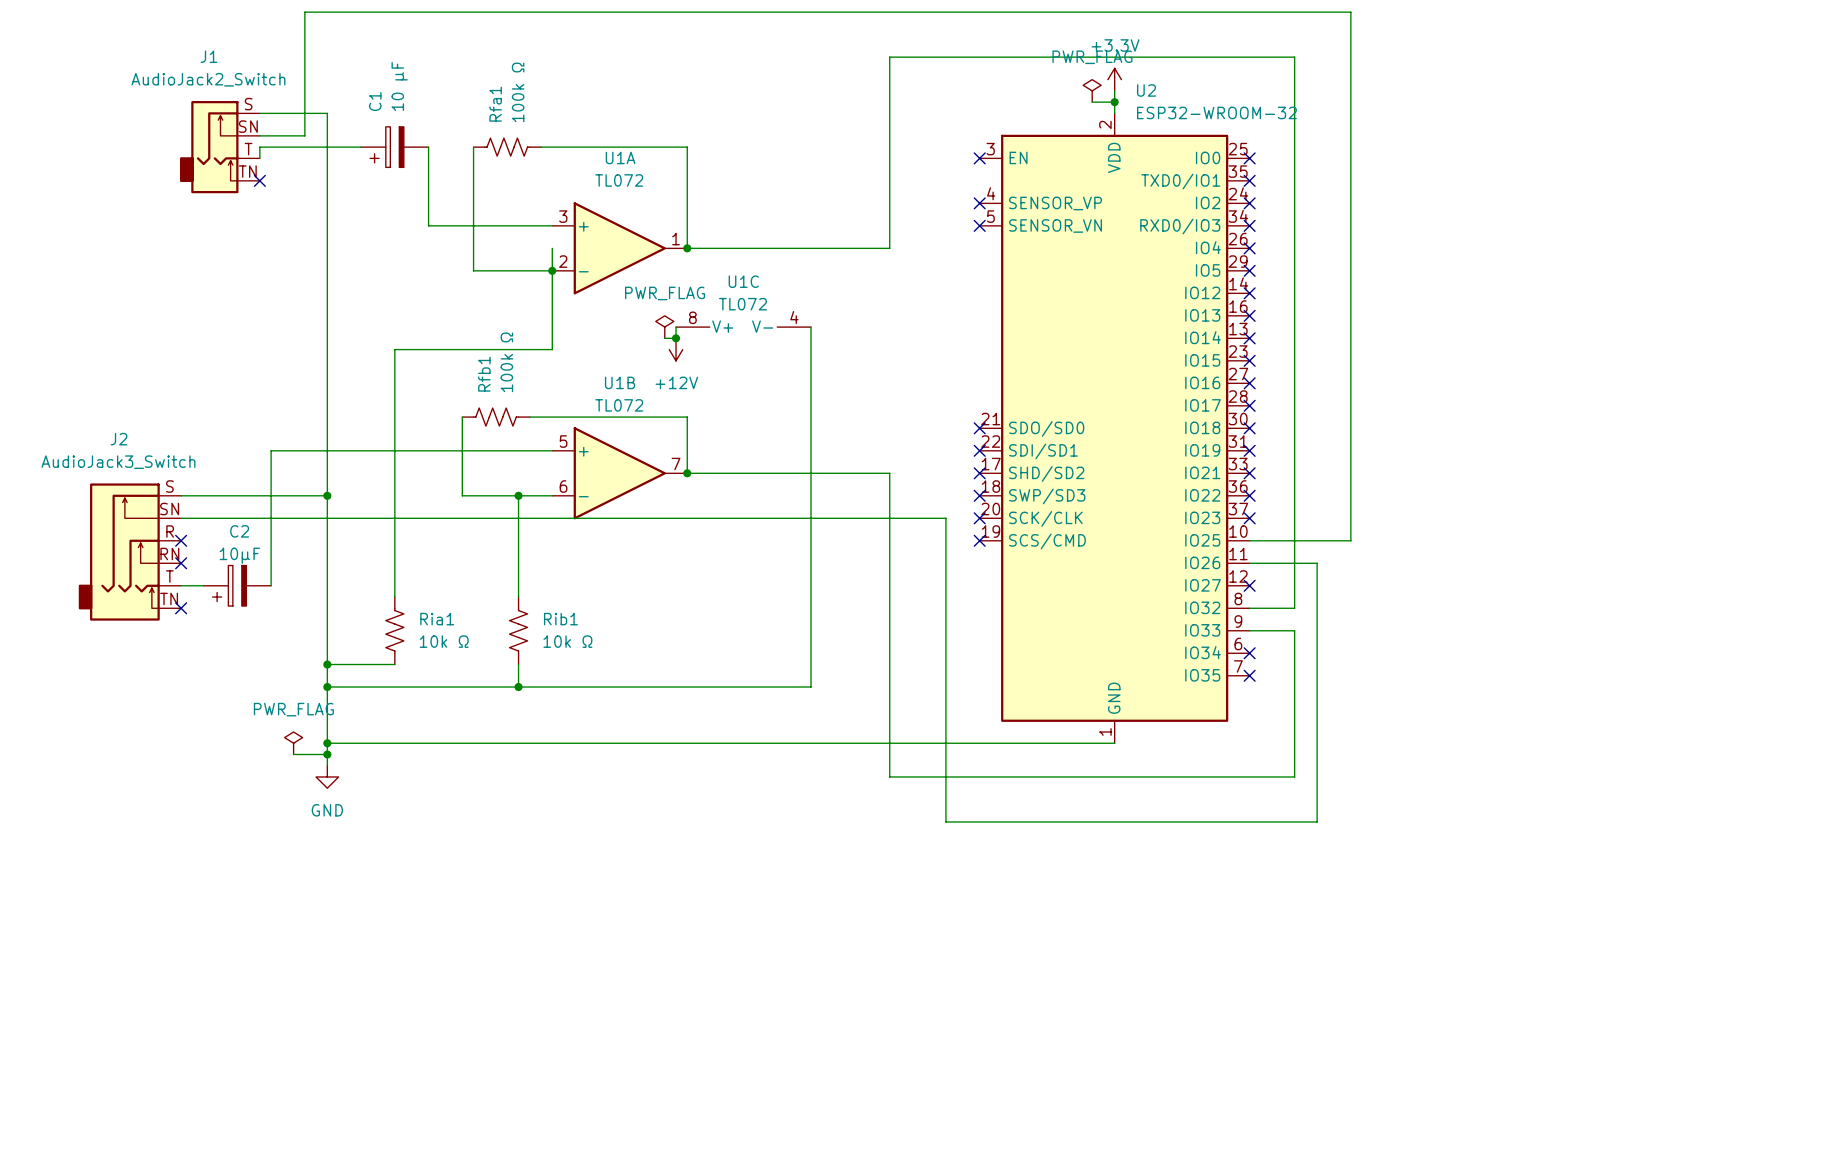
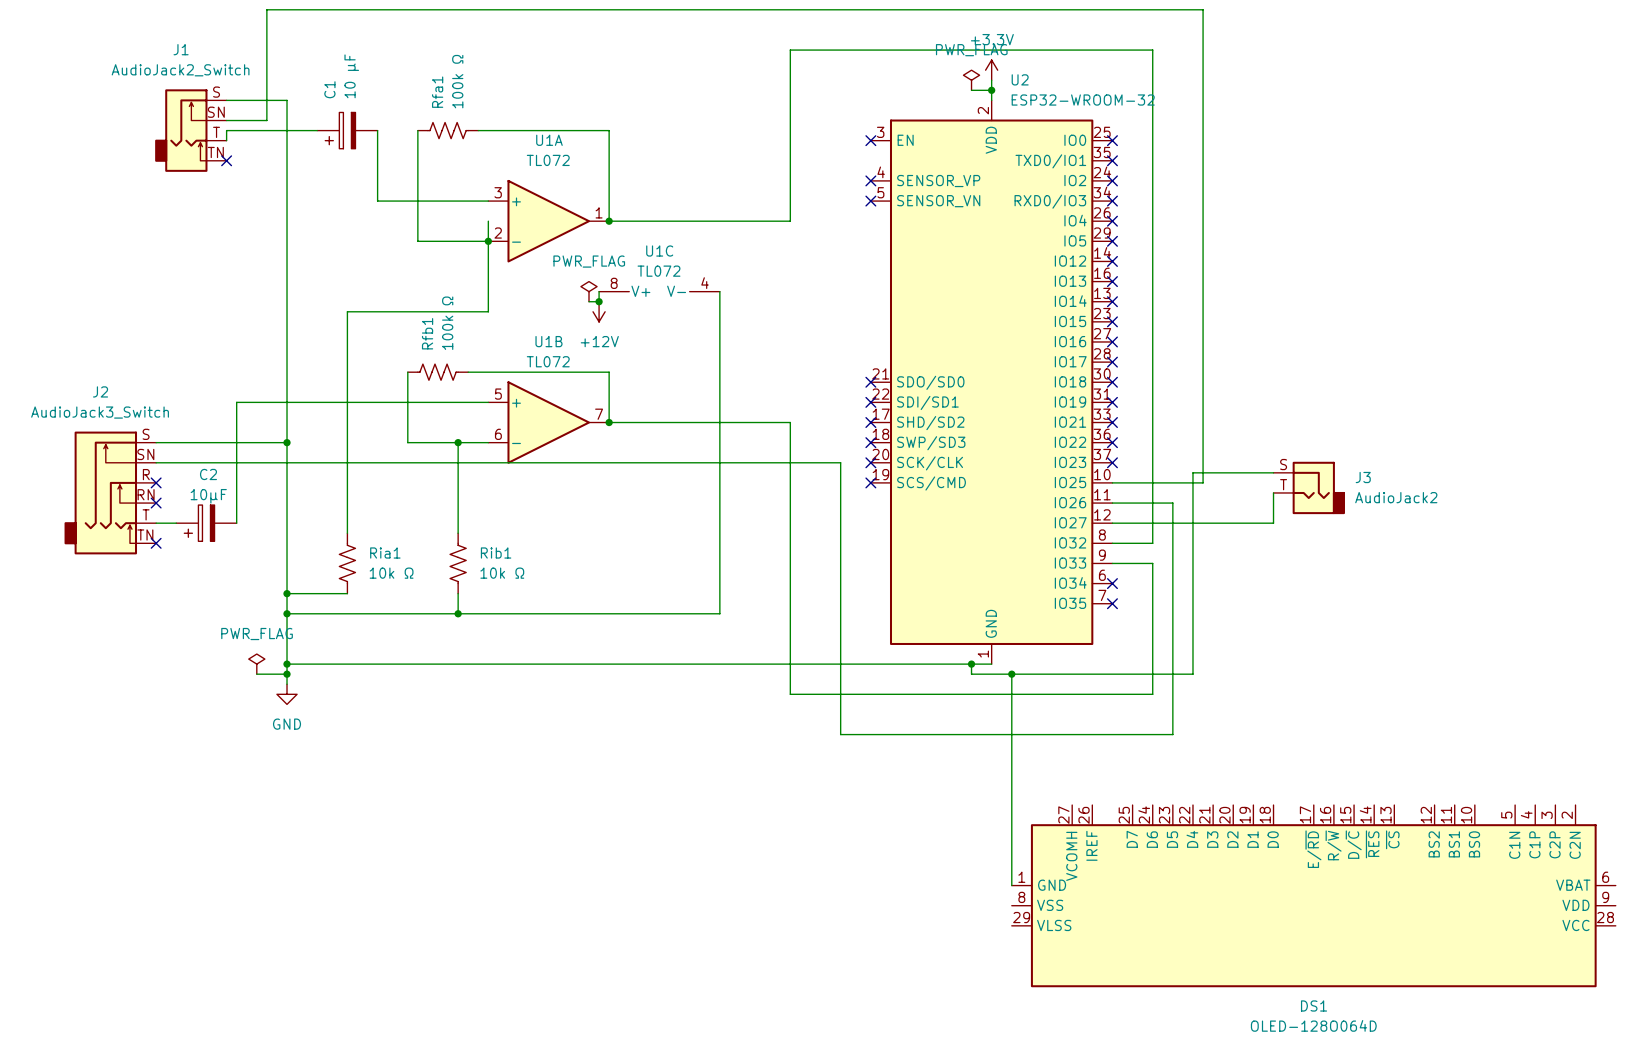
wire: none -> (1273, 472) (1192, 472) (1192, 674) (971, 674) (971, 664)
J3: none -> AudioJack2 (1309, 487)
wire: none -> (1273, 492) (1273, 523) (1112, 523)
no-connect mark: (1249, 585) -> none
junction: none -> (971, 664)
wire: none -> (1011, 674) (1011, 885)
junction: none -> (1011, 674)
DS1: none -> OLED-128O064D (1313, 896)

